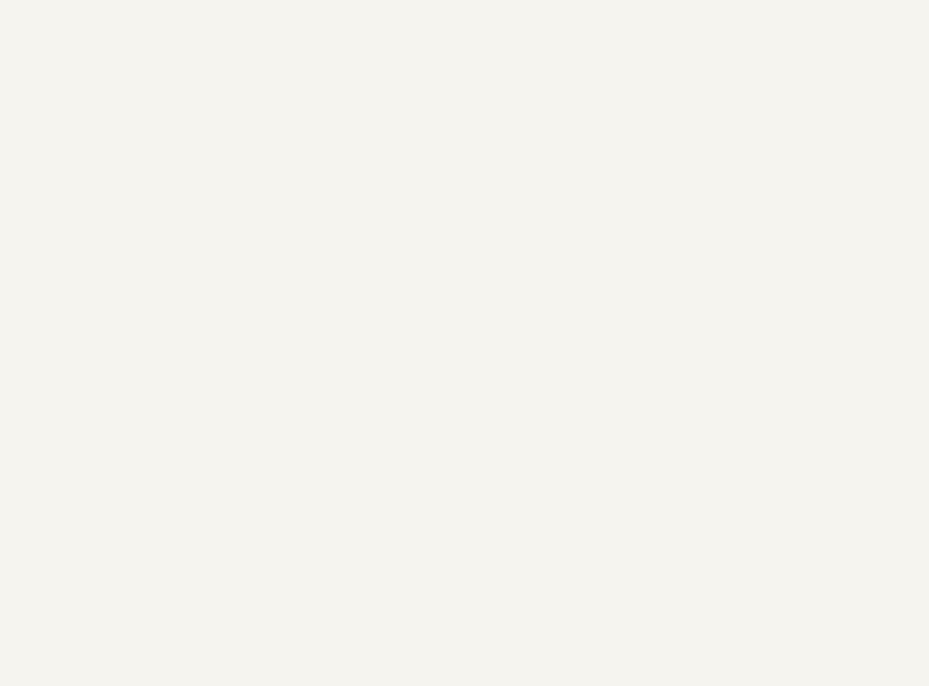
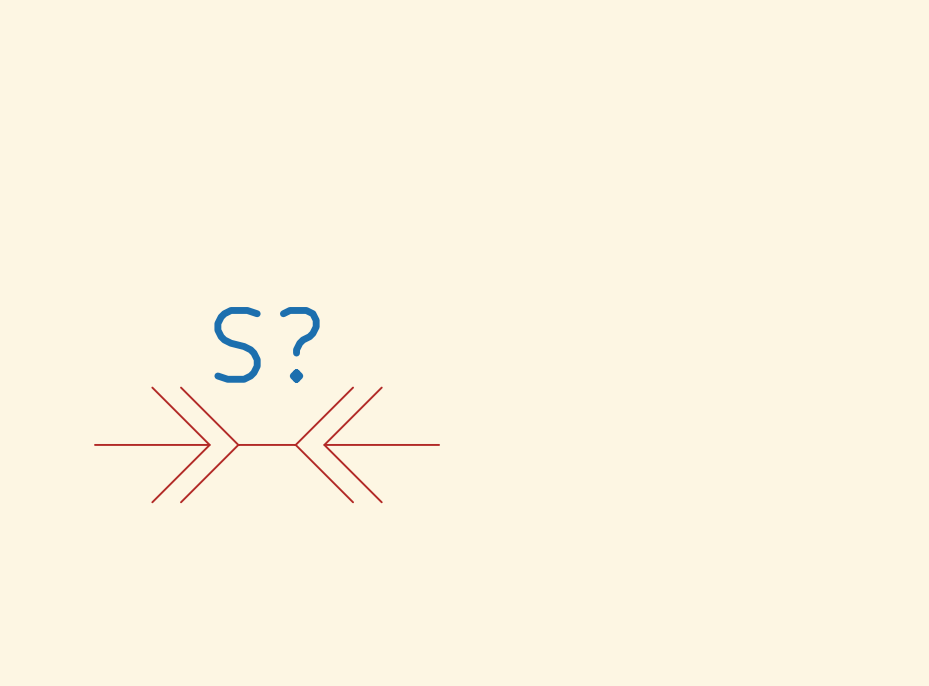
S?: none -> (267, 444)

